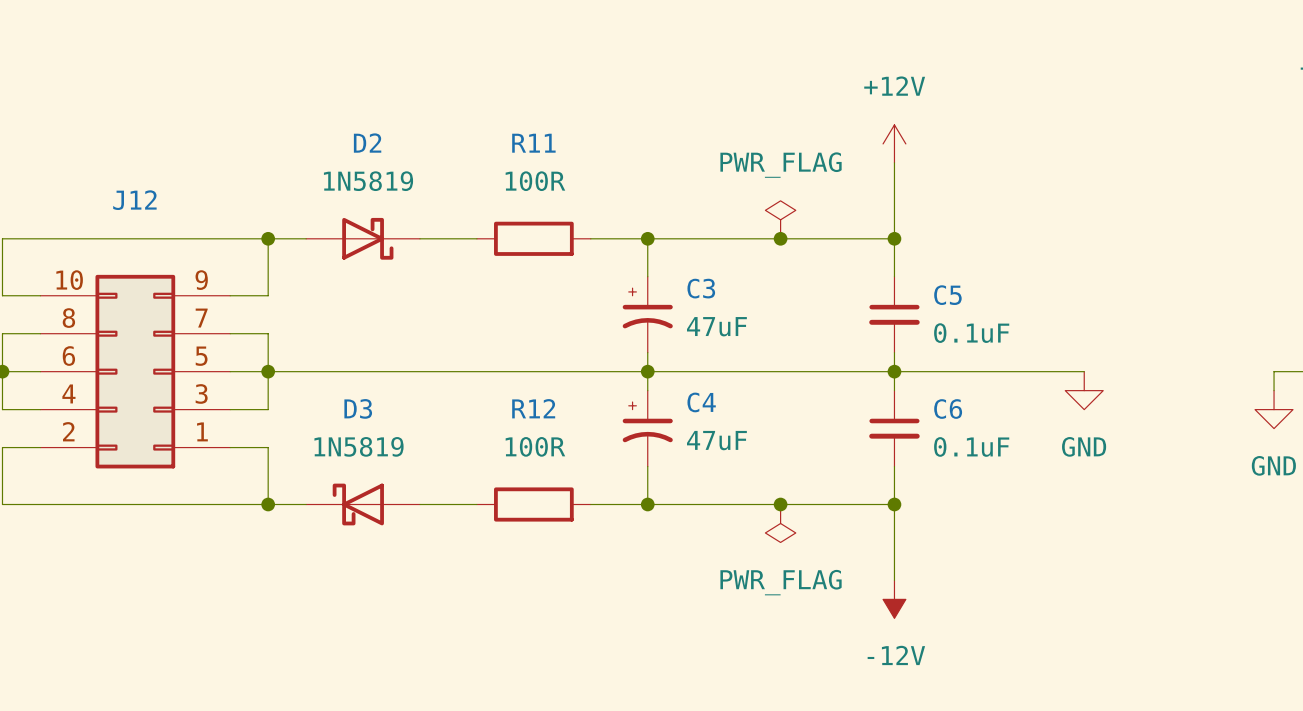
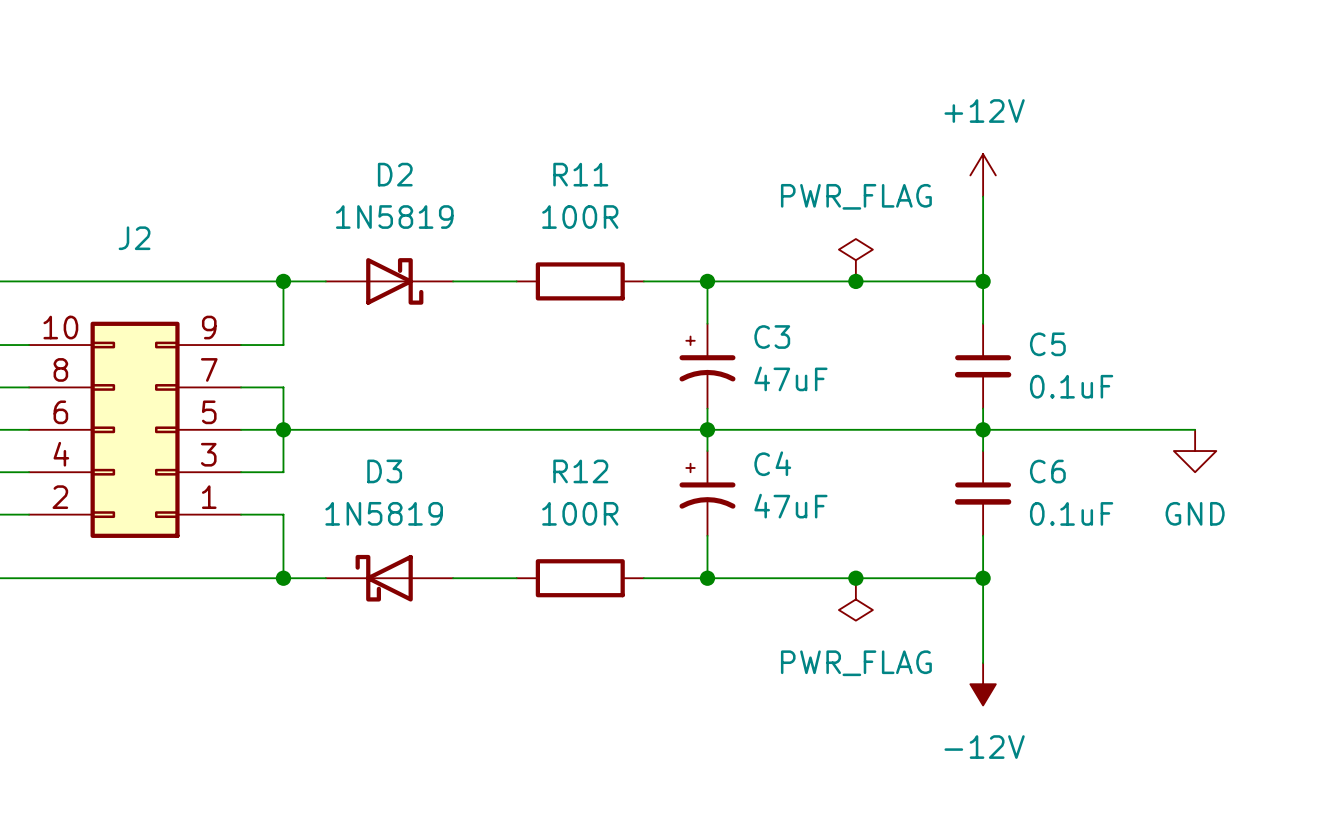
J12 name: J12 (134, 200) -> J2 (134, 238)

